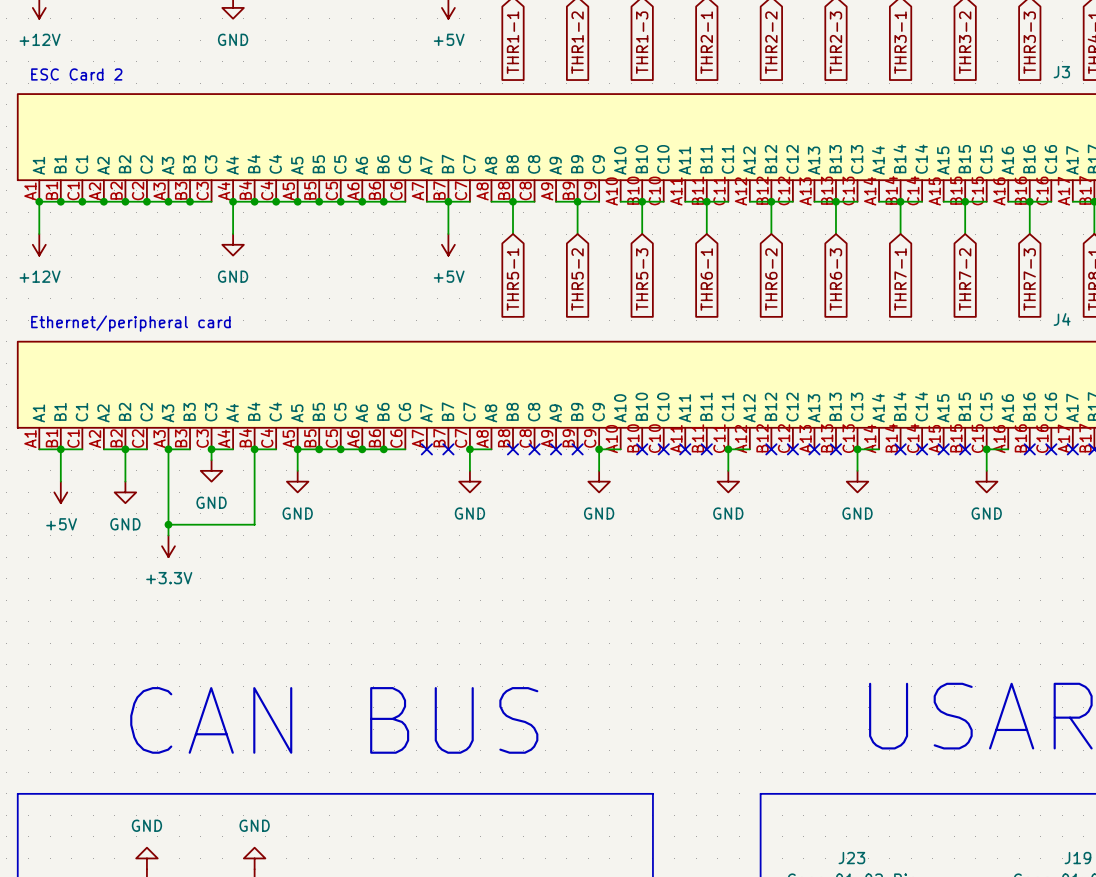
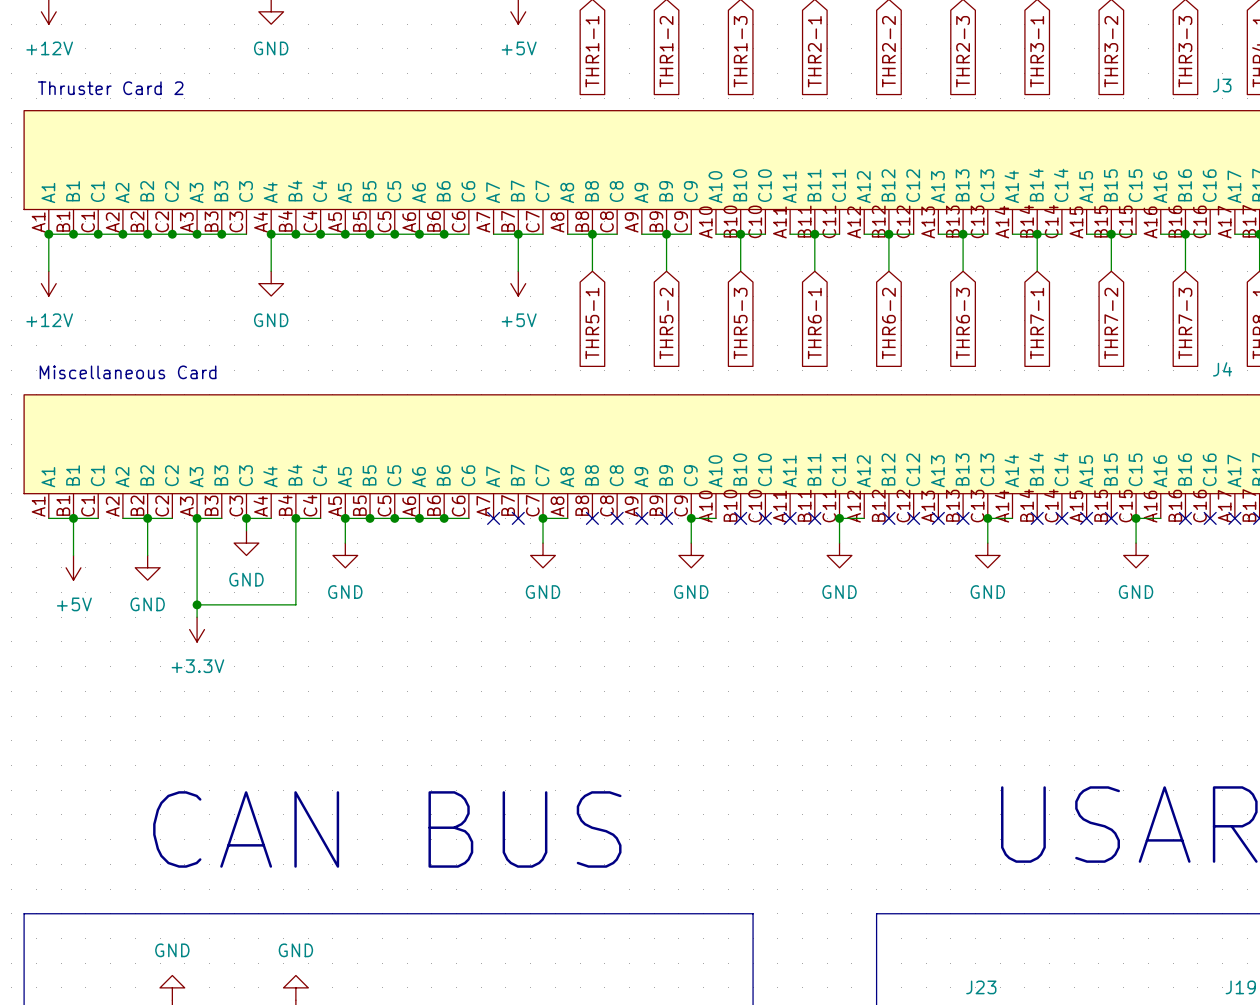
text: ESC Card 2 (76, 74) -> Thruster Card 2 (110, 88)
text: Ethernet/peripheral card (130, 323) -> Miscellaneous Card (128, 372)

